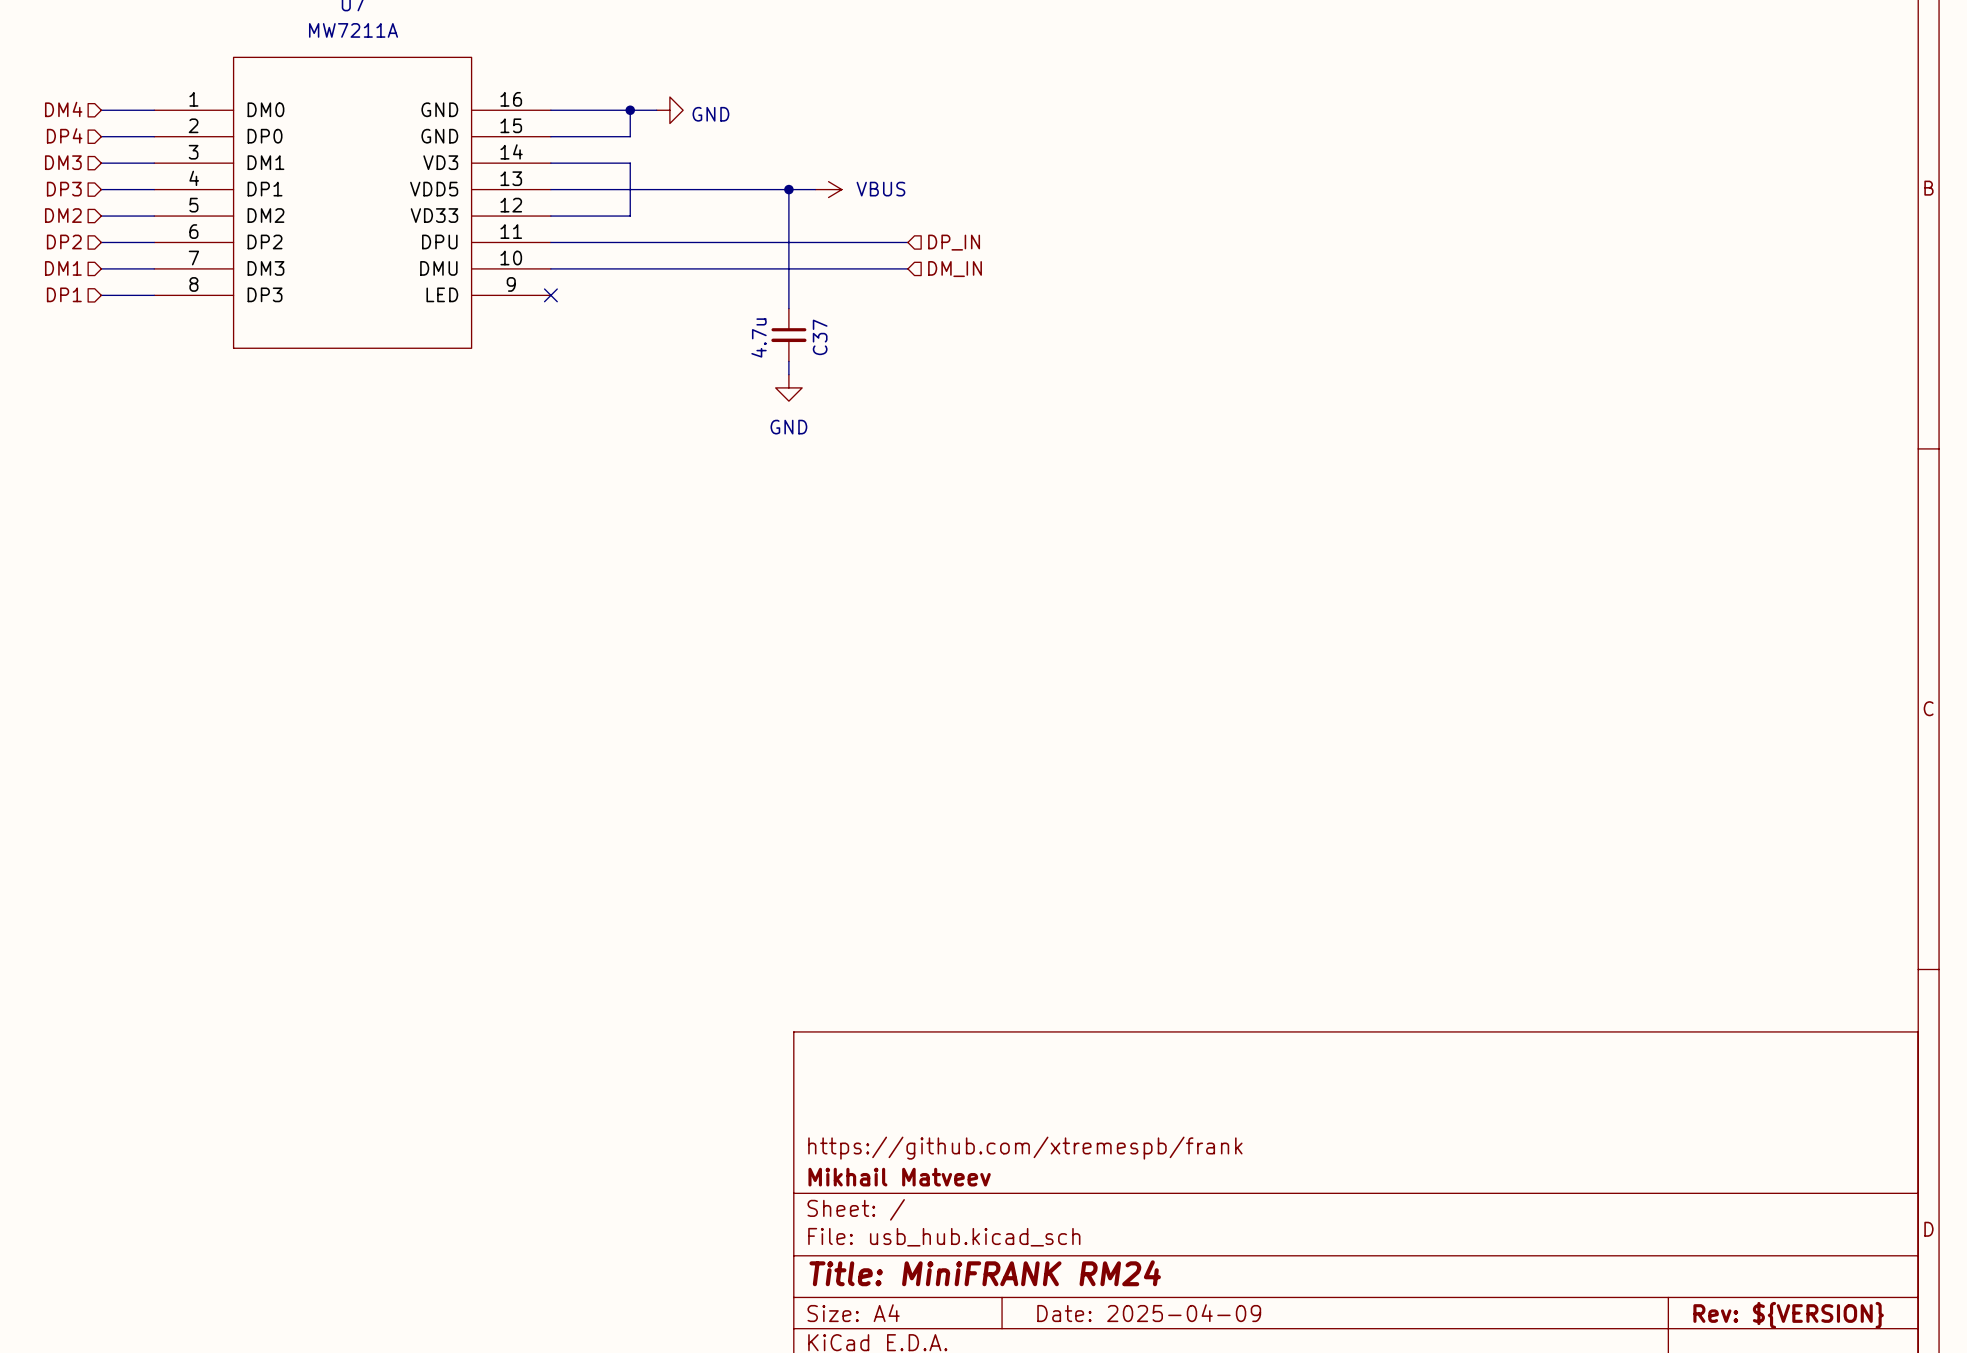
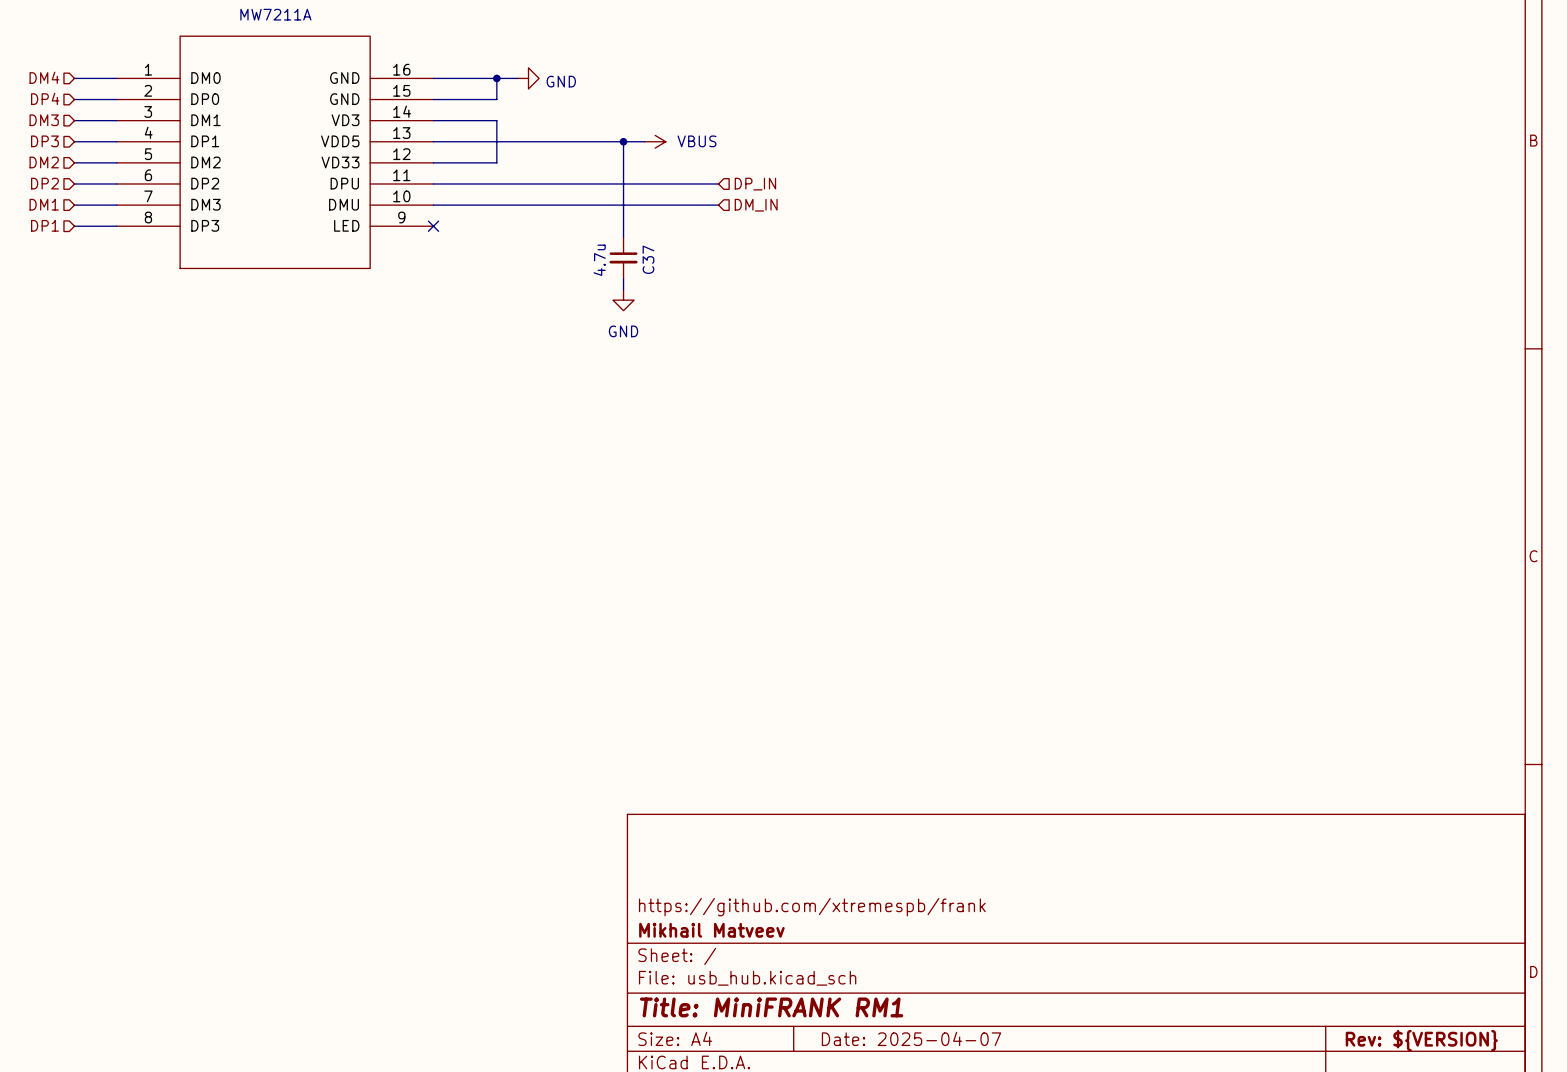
title block: Title: MiniFRANK RM24 (985, 1273) -> Title: MiniFRANK RM1 (771, 1007)
title block: Date: 2025-04-09 (1149, 1313) -> Date: 2025-04-07 (911, 1038)

